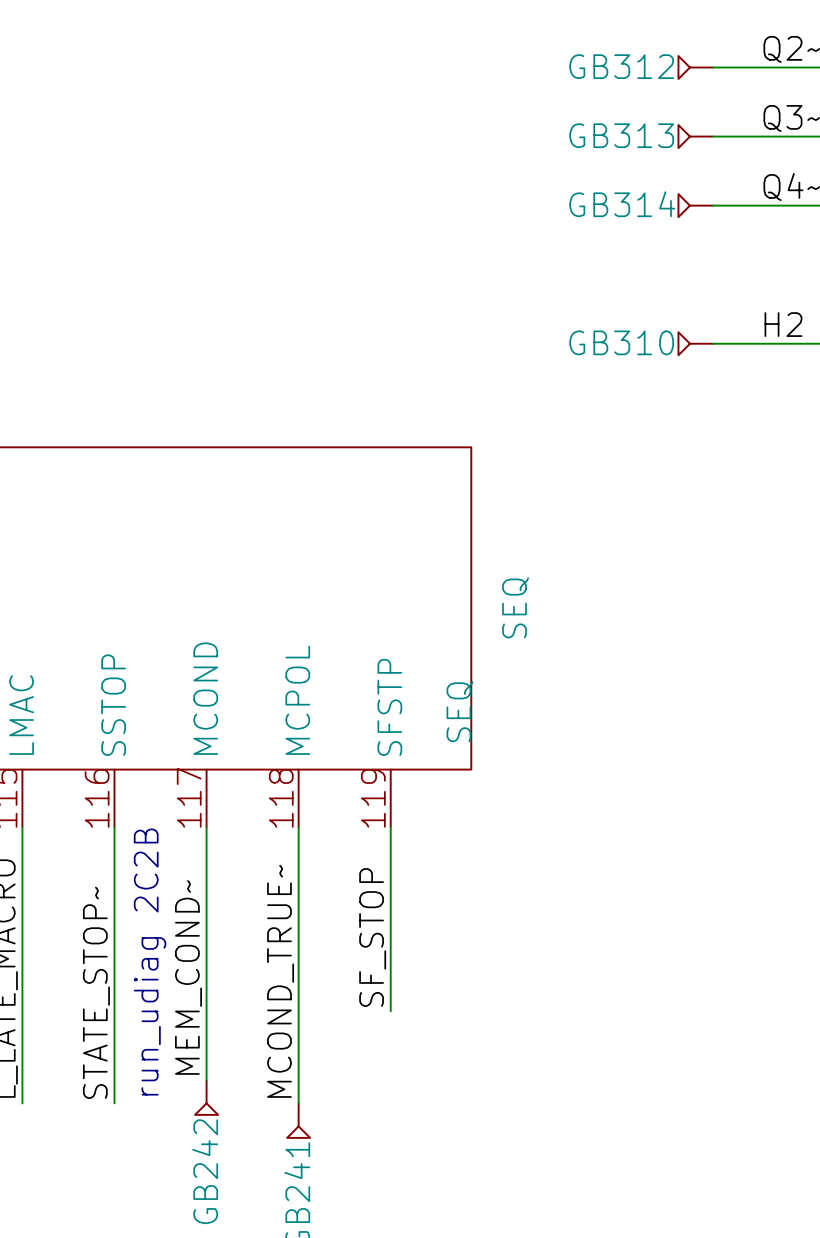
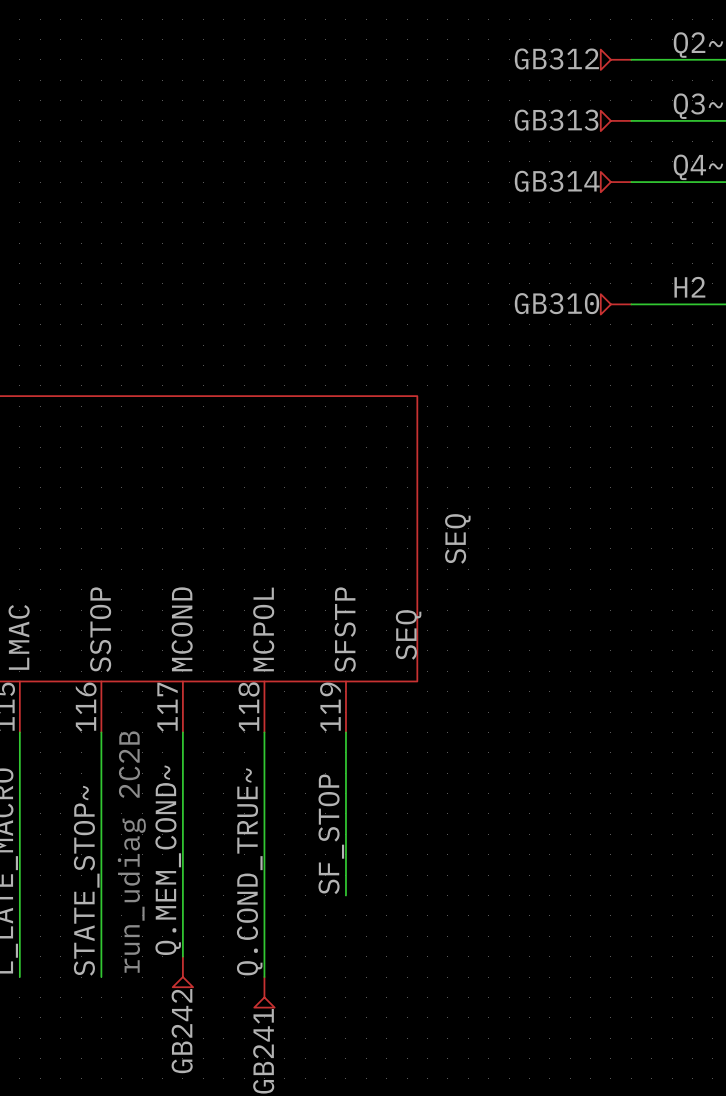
label: MEM_COND~ (188, 977) -> Q.MEM_COND~ (168, 860)
label: MCOND_TRUE~ (280, 981) -> Q.COND_TRUE~ (249, 871)

